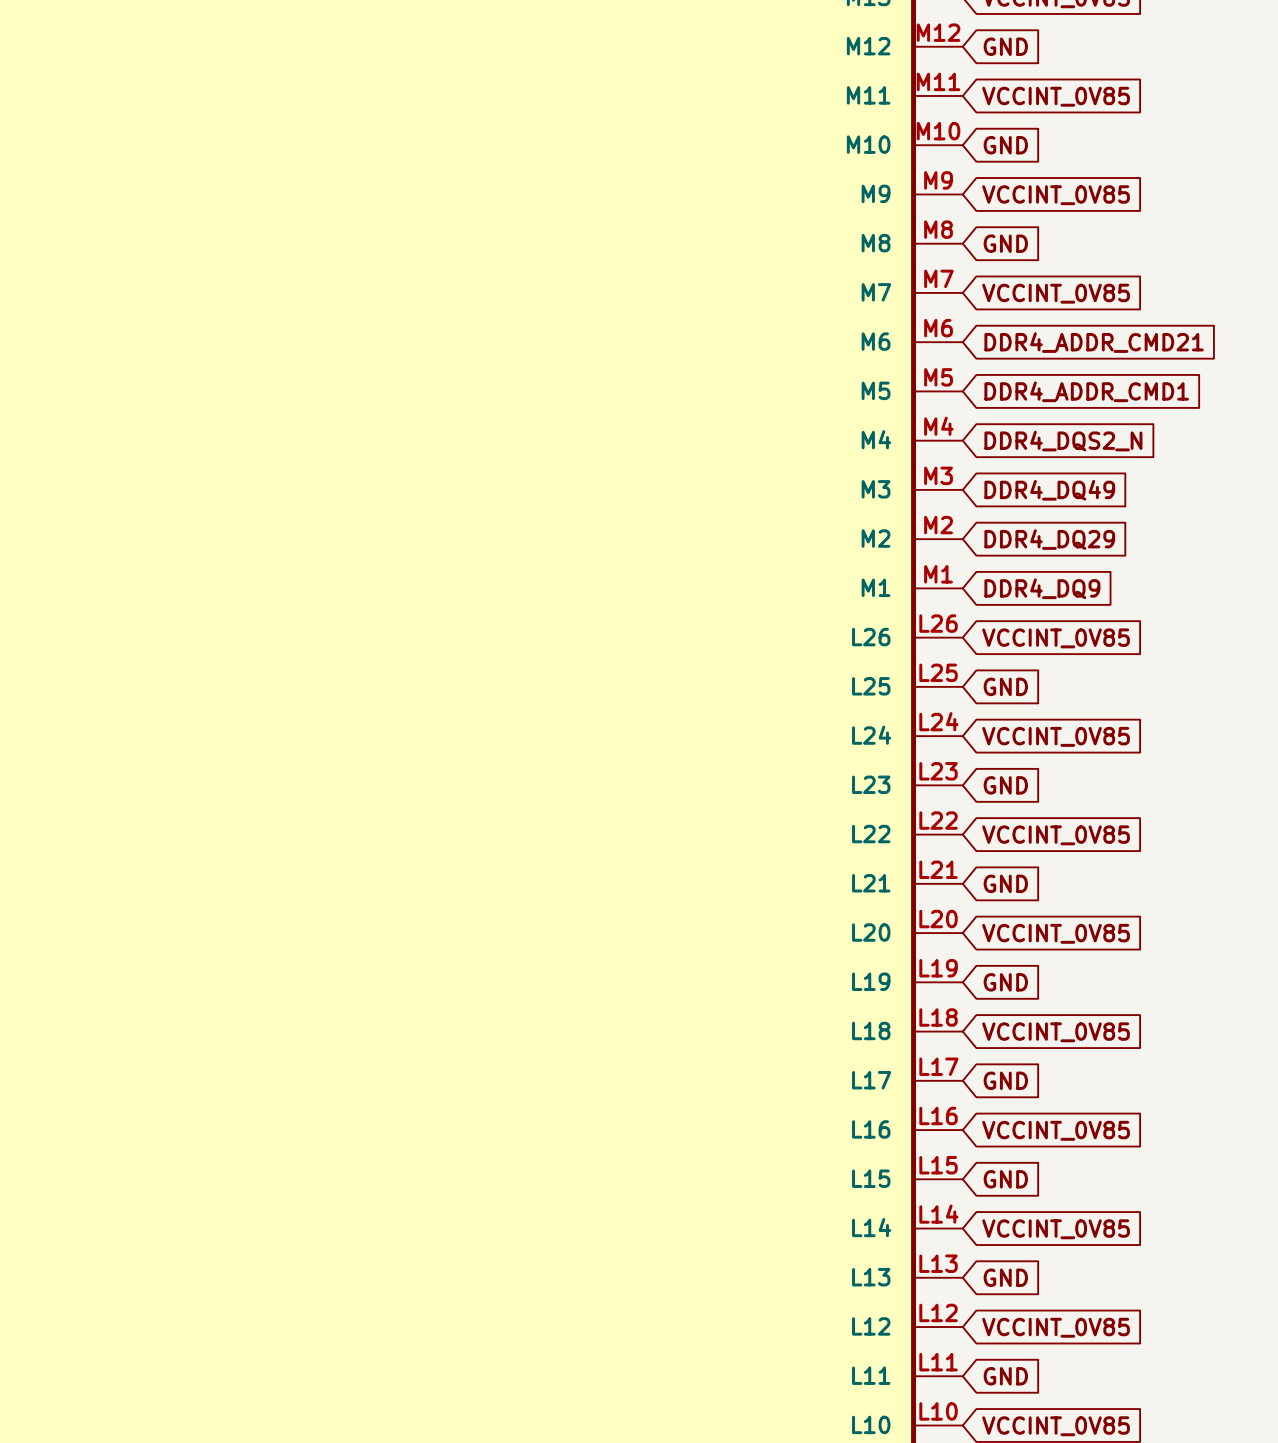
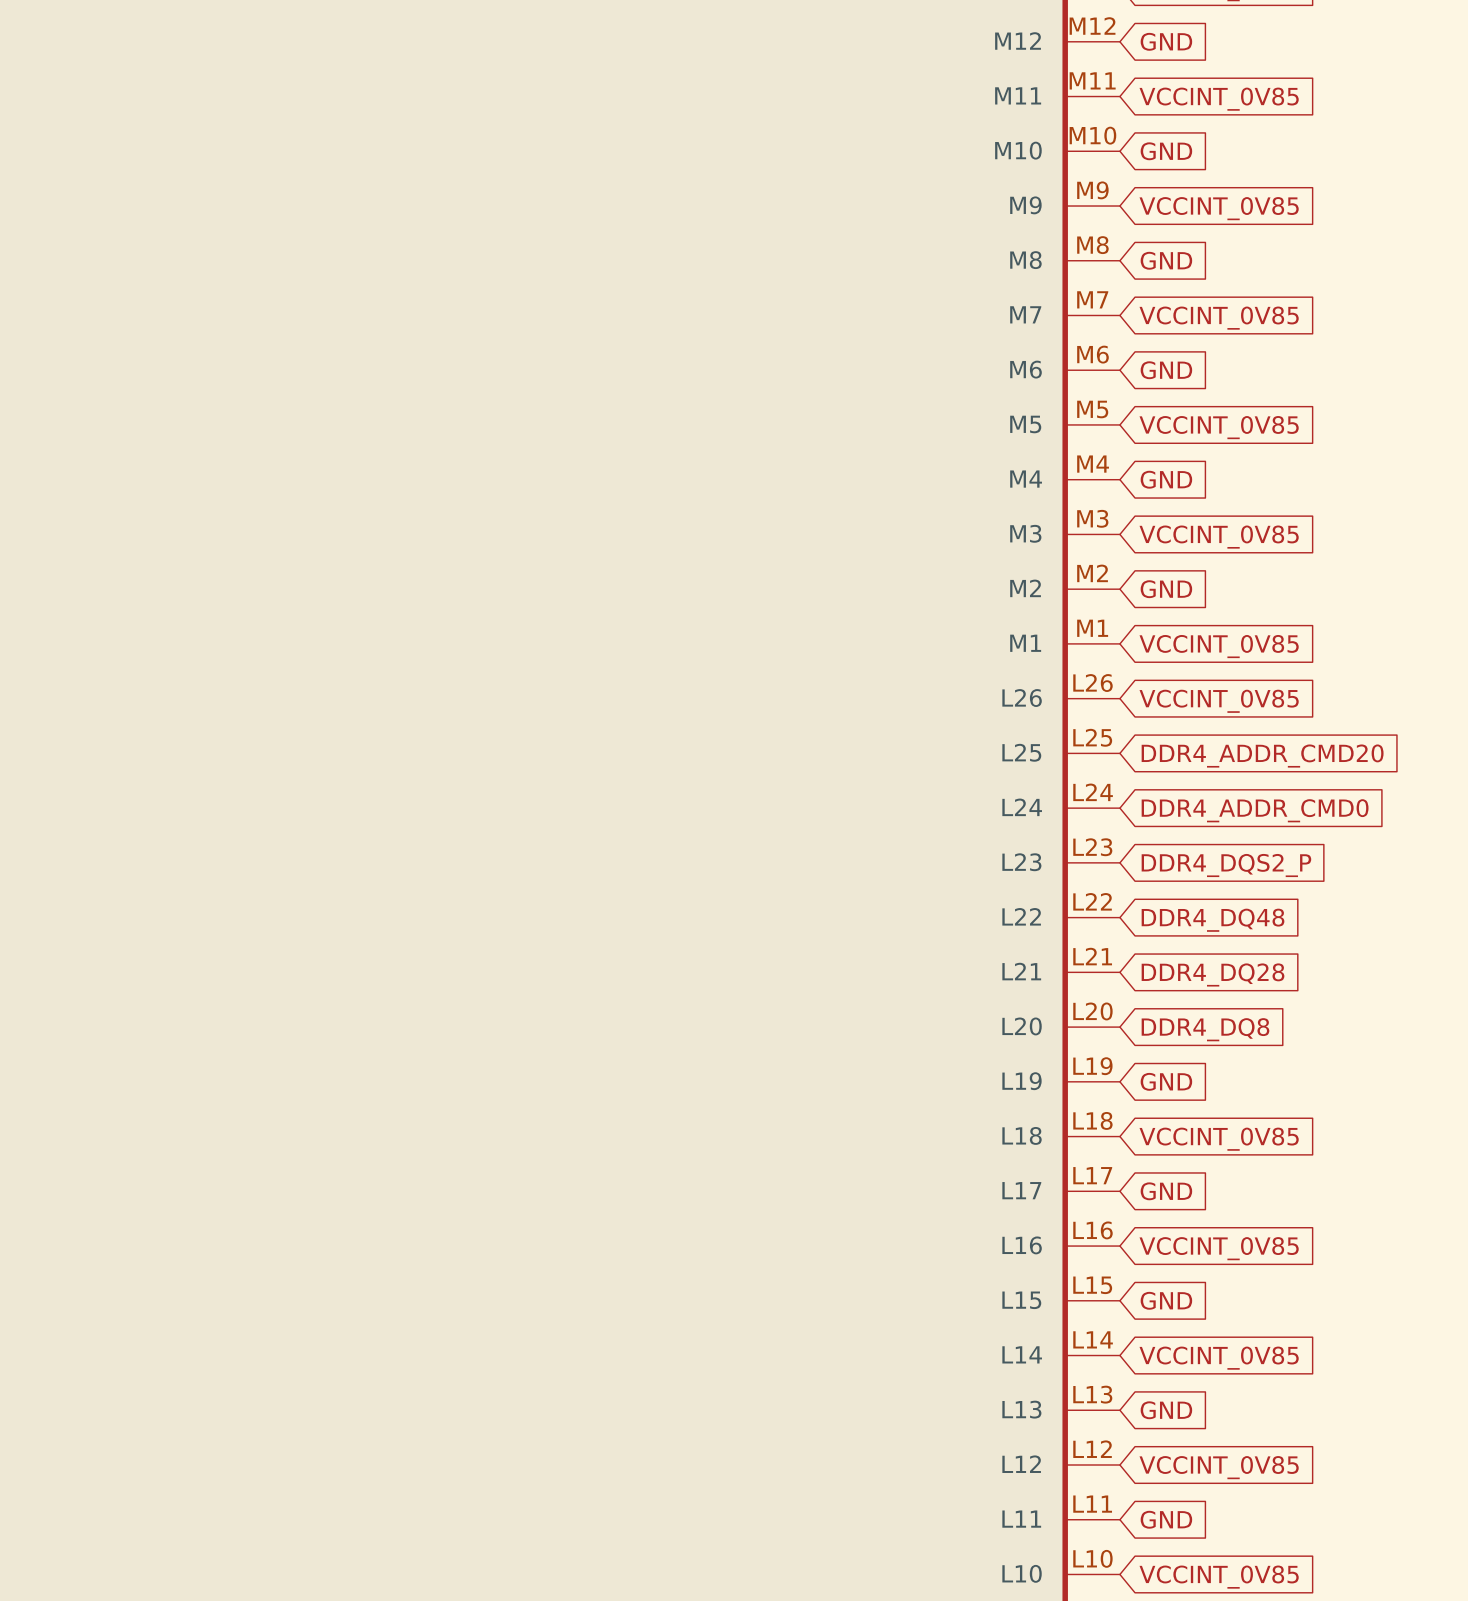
global label: DDR4_ADDR_CMD21 (1094, 342) -> GND (1166, 370)
global label: DDR4_ADDR_CMD1 (1086, 391) -> VCCINT_0V85 (1219, 427)
global label: DDR4_DQS2_N (1063, 441) -> GND (1166, 479)
global label: DDR4_DQ49 (1049, 490) -> VCCINT_0V85 (1219, 537)
global label: DDR4_DQ29 (1049, 539) -> GND (1166, 589)
global label: DDR4_DQ9 (1042, 588) -> VCCINT_0V85 (1219, 646)
global label: GND (1005, 686) -> DDR4_ADDR_CMD20 (1262, 756)
global label: VCCINT_0V85 (1056, 736) -> DDR4_ADDR_CMD0 (1255, 810)
global label: GND (1005, 785) -> DDR4_DQS2_P (1226, 865)
global label: VCCINT_0V85 (1056, 835) -> DDR4_DQ48 (1213, 920)
global label: GND (1005, 883) -> DDR4_DQ28 (1213, 974)
global label: VCCINT_0V85 (1056, 933) -> DDR4_DQ8 (1205, 1029)

